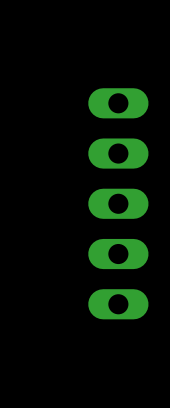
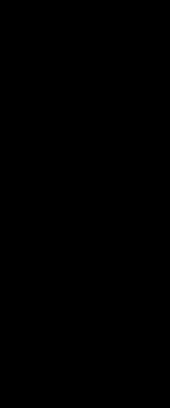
part: (118, 203) -> none

